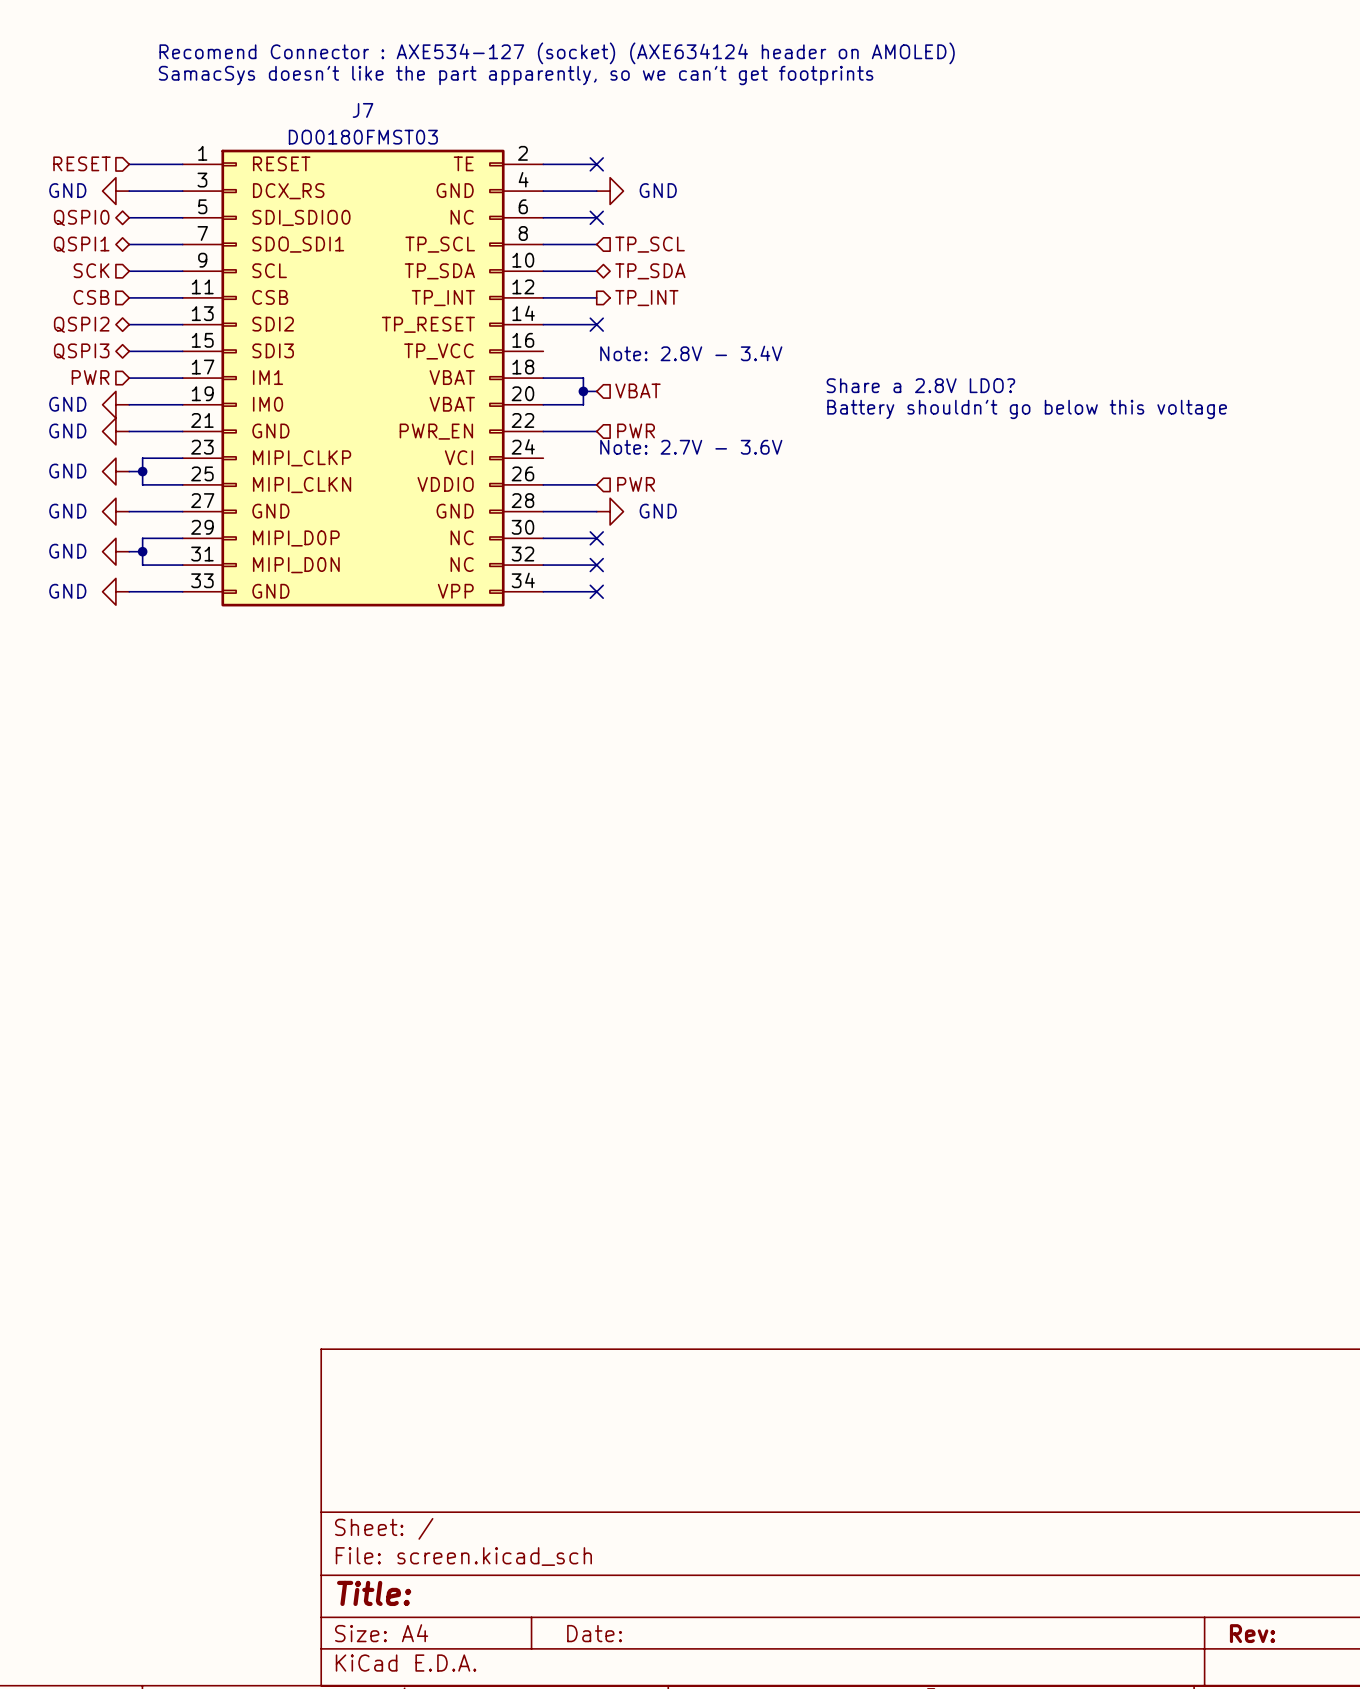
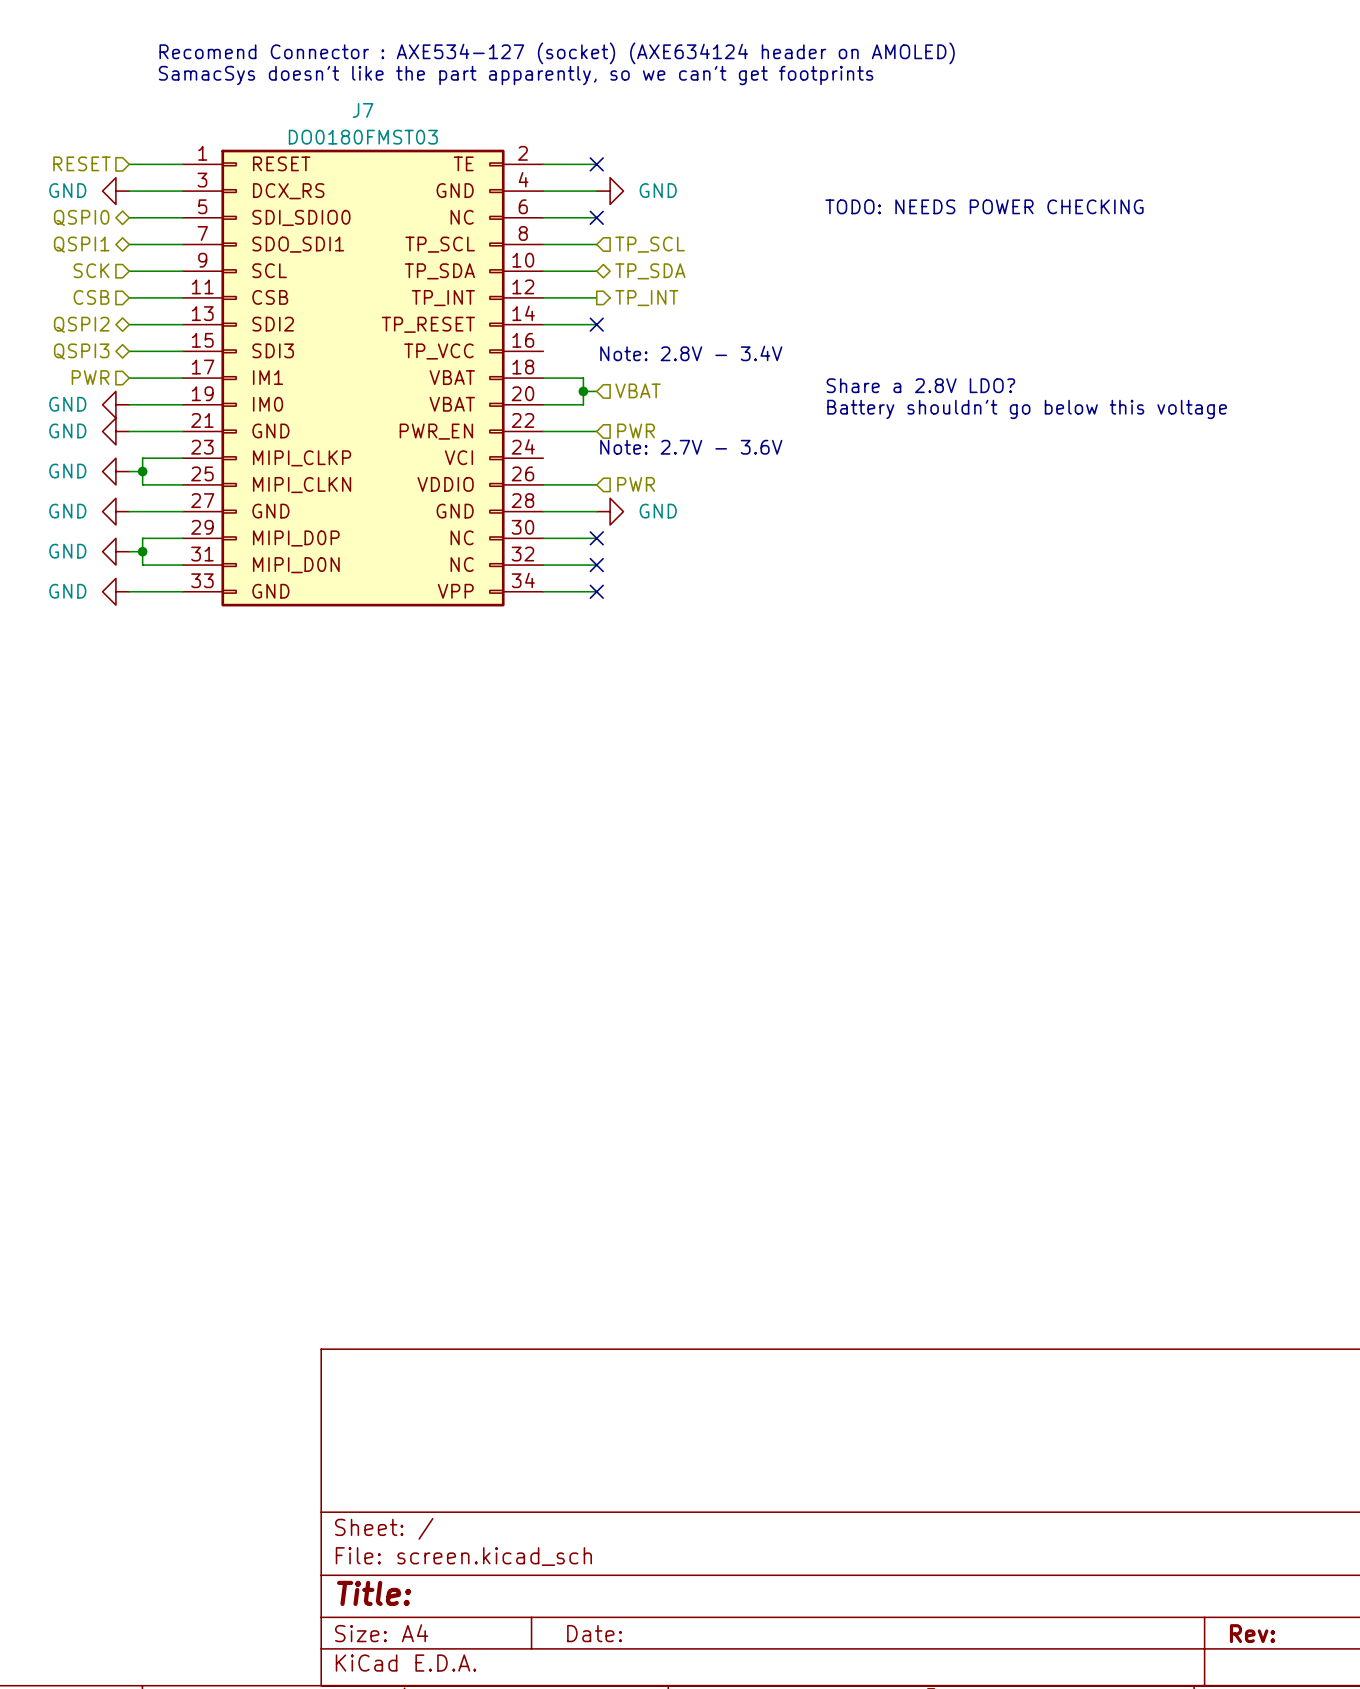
text: none -> TODO: NEEDS POWER CHECKING (984, 206)

